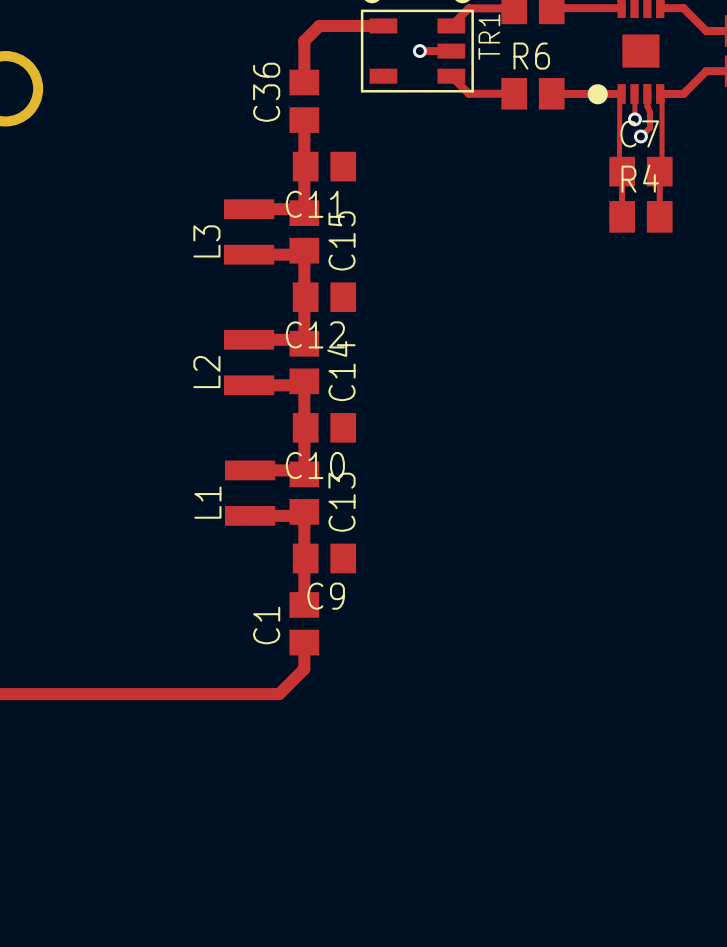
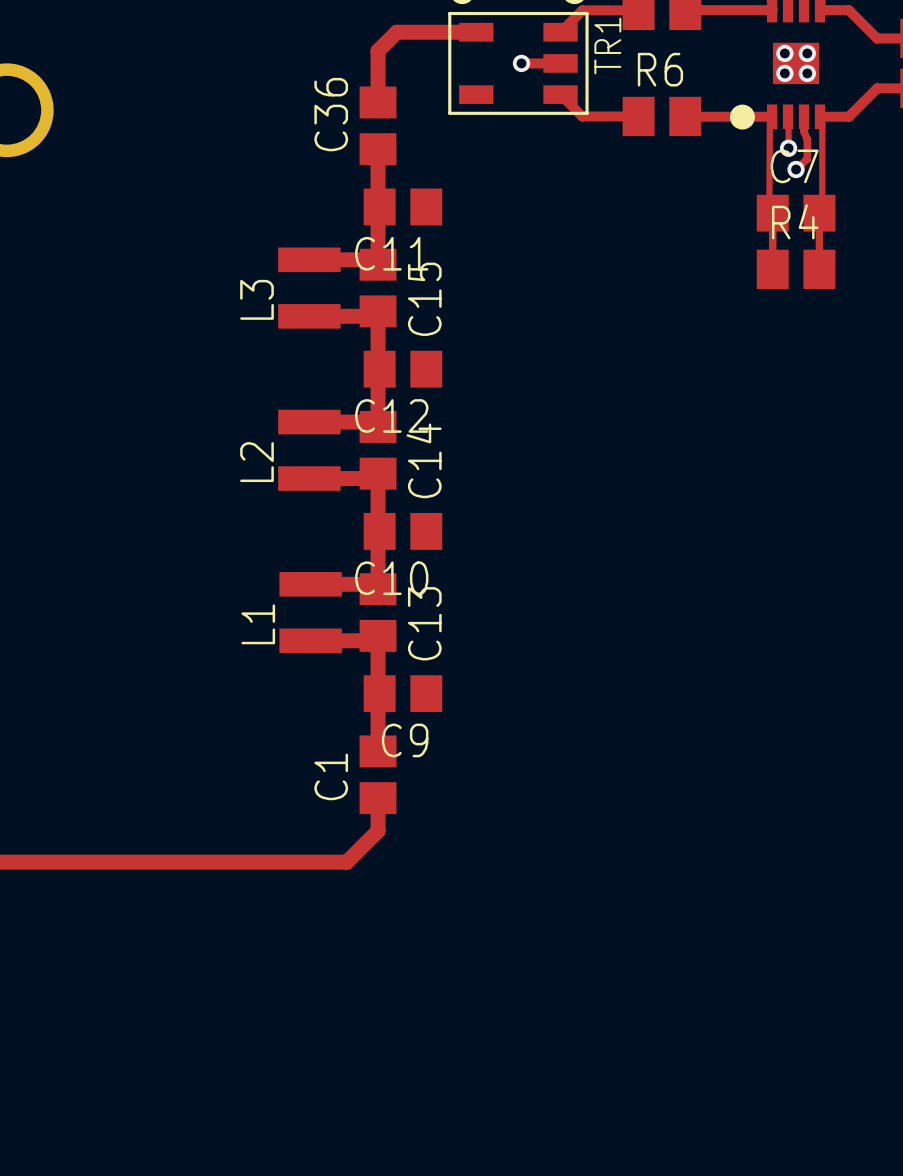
via: none -> (784, 53)
via: none -> (807, 53)
via: none -> (784, 73)
via: none -> (807, 73)

